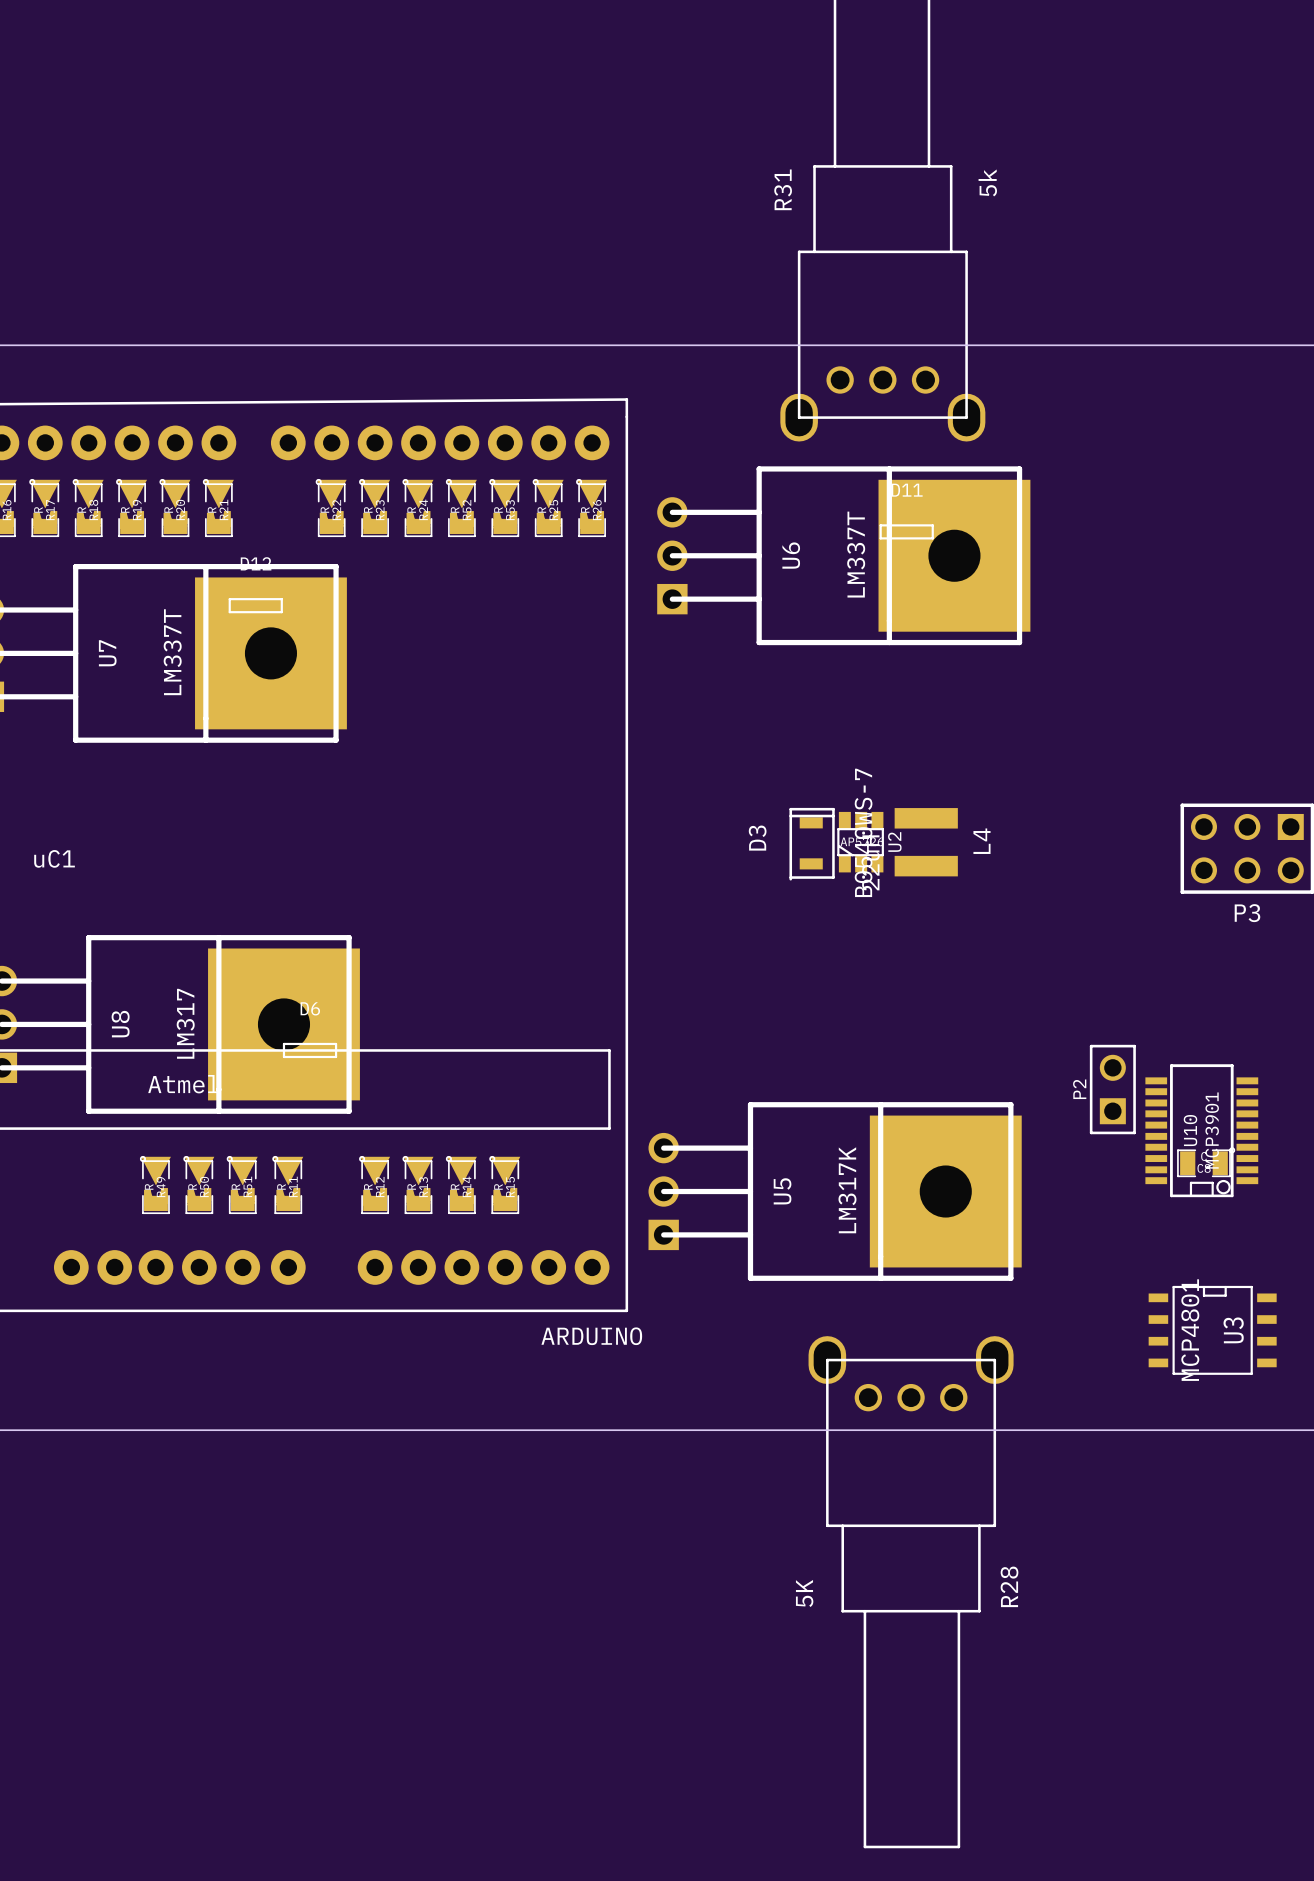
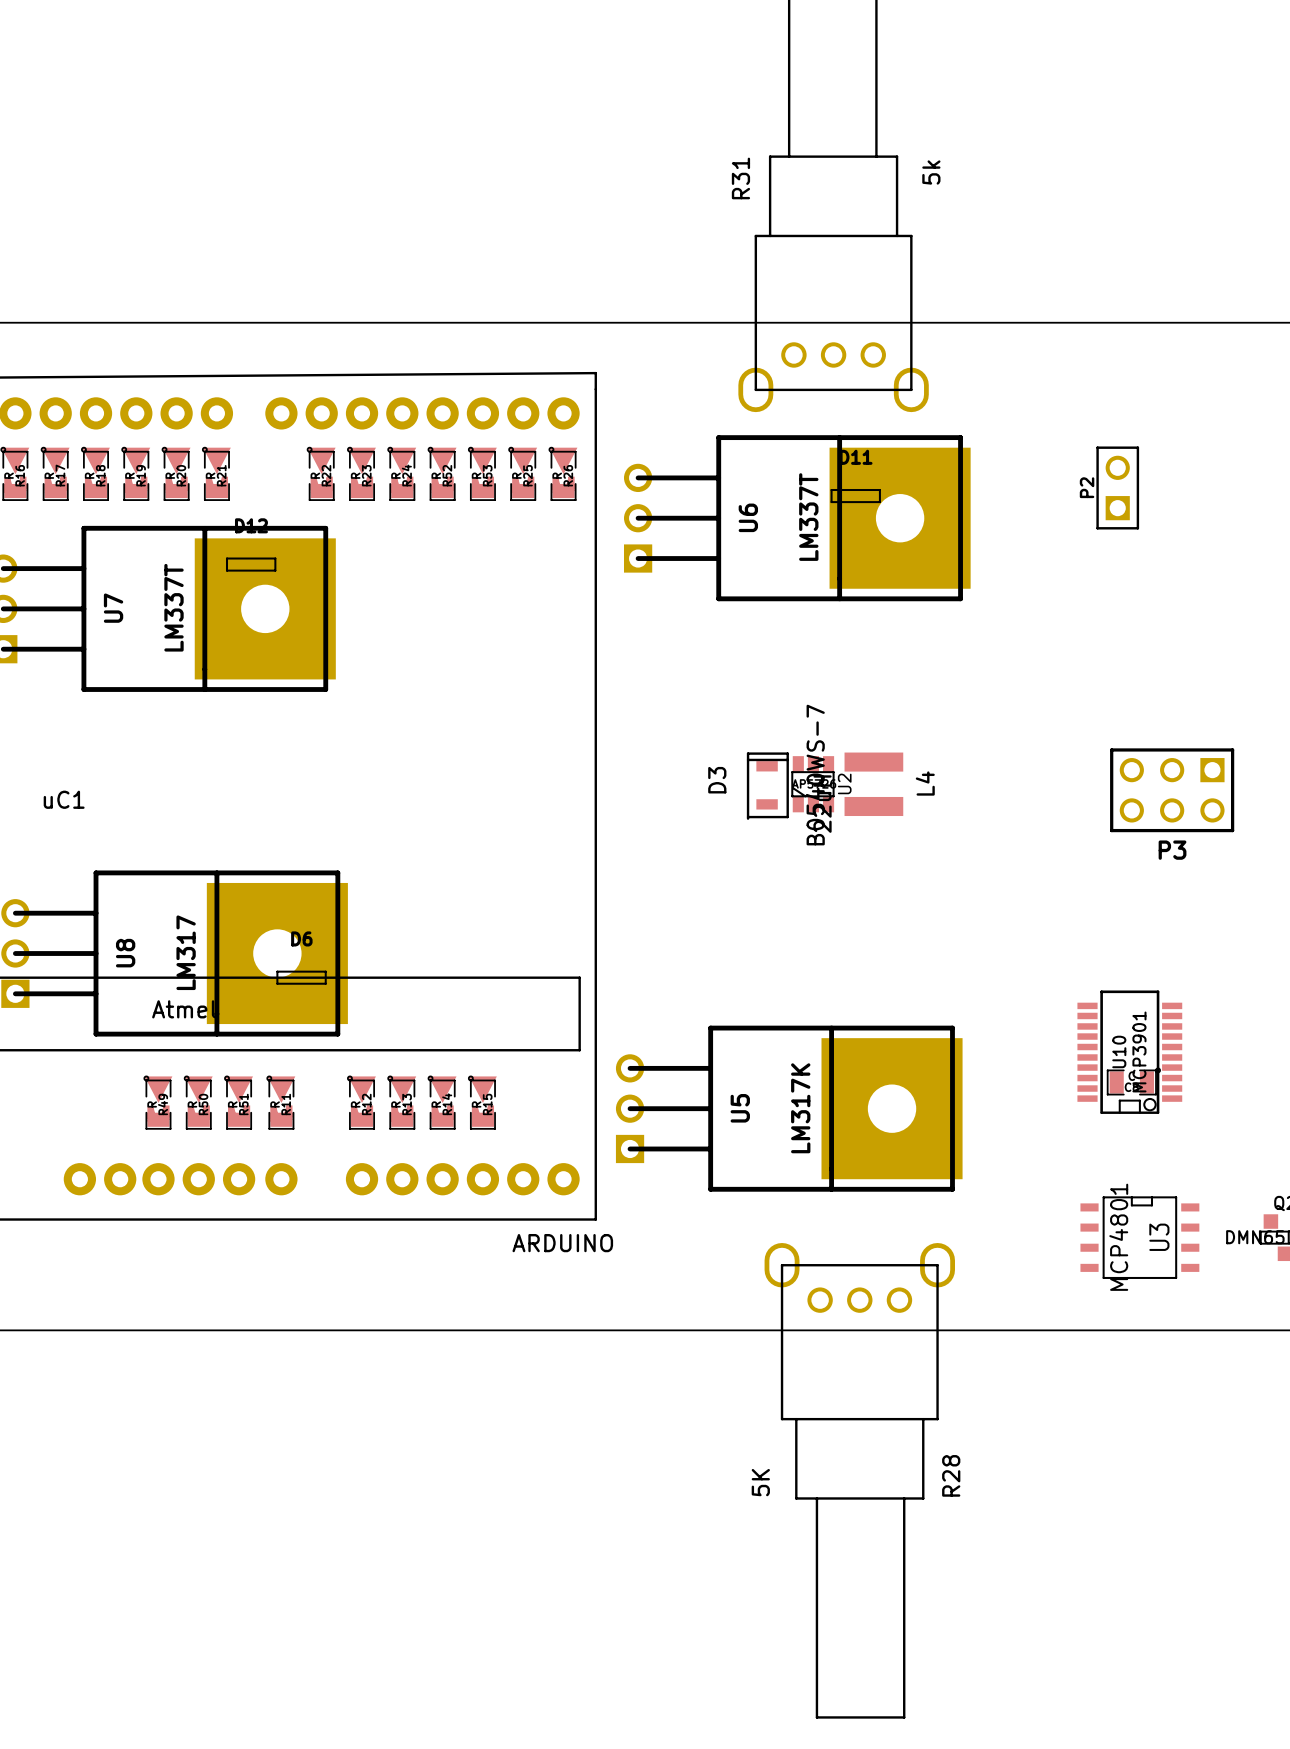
P2 position: (1112, 1089) -> (1117, 487)

